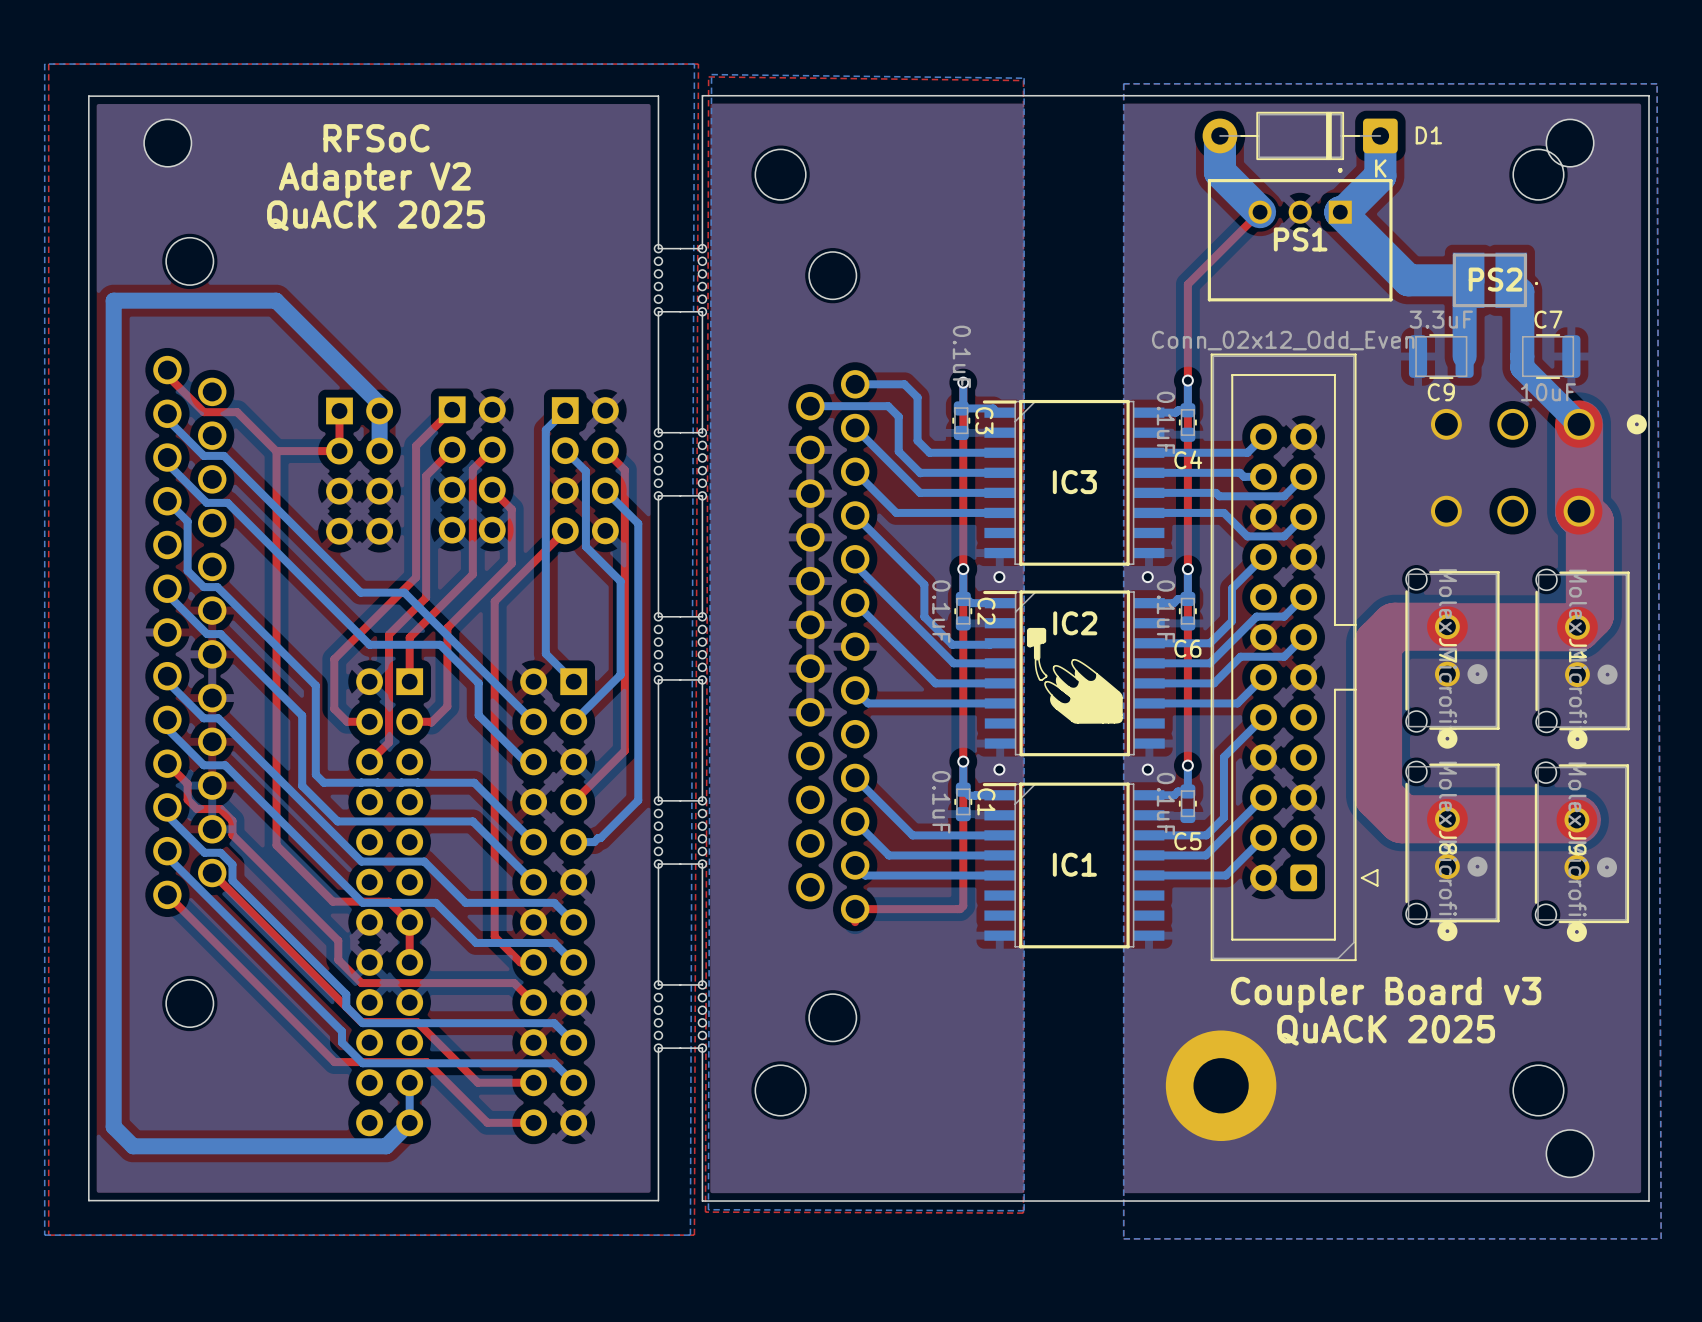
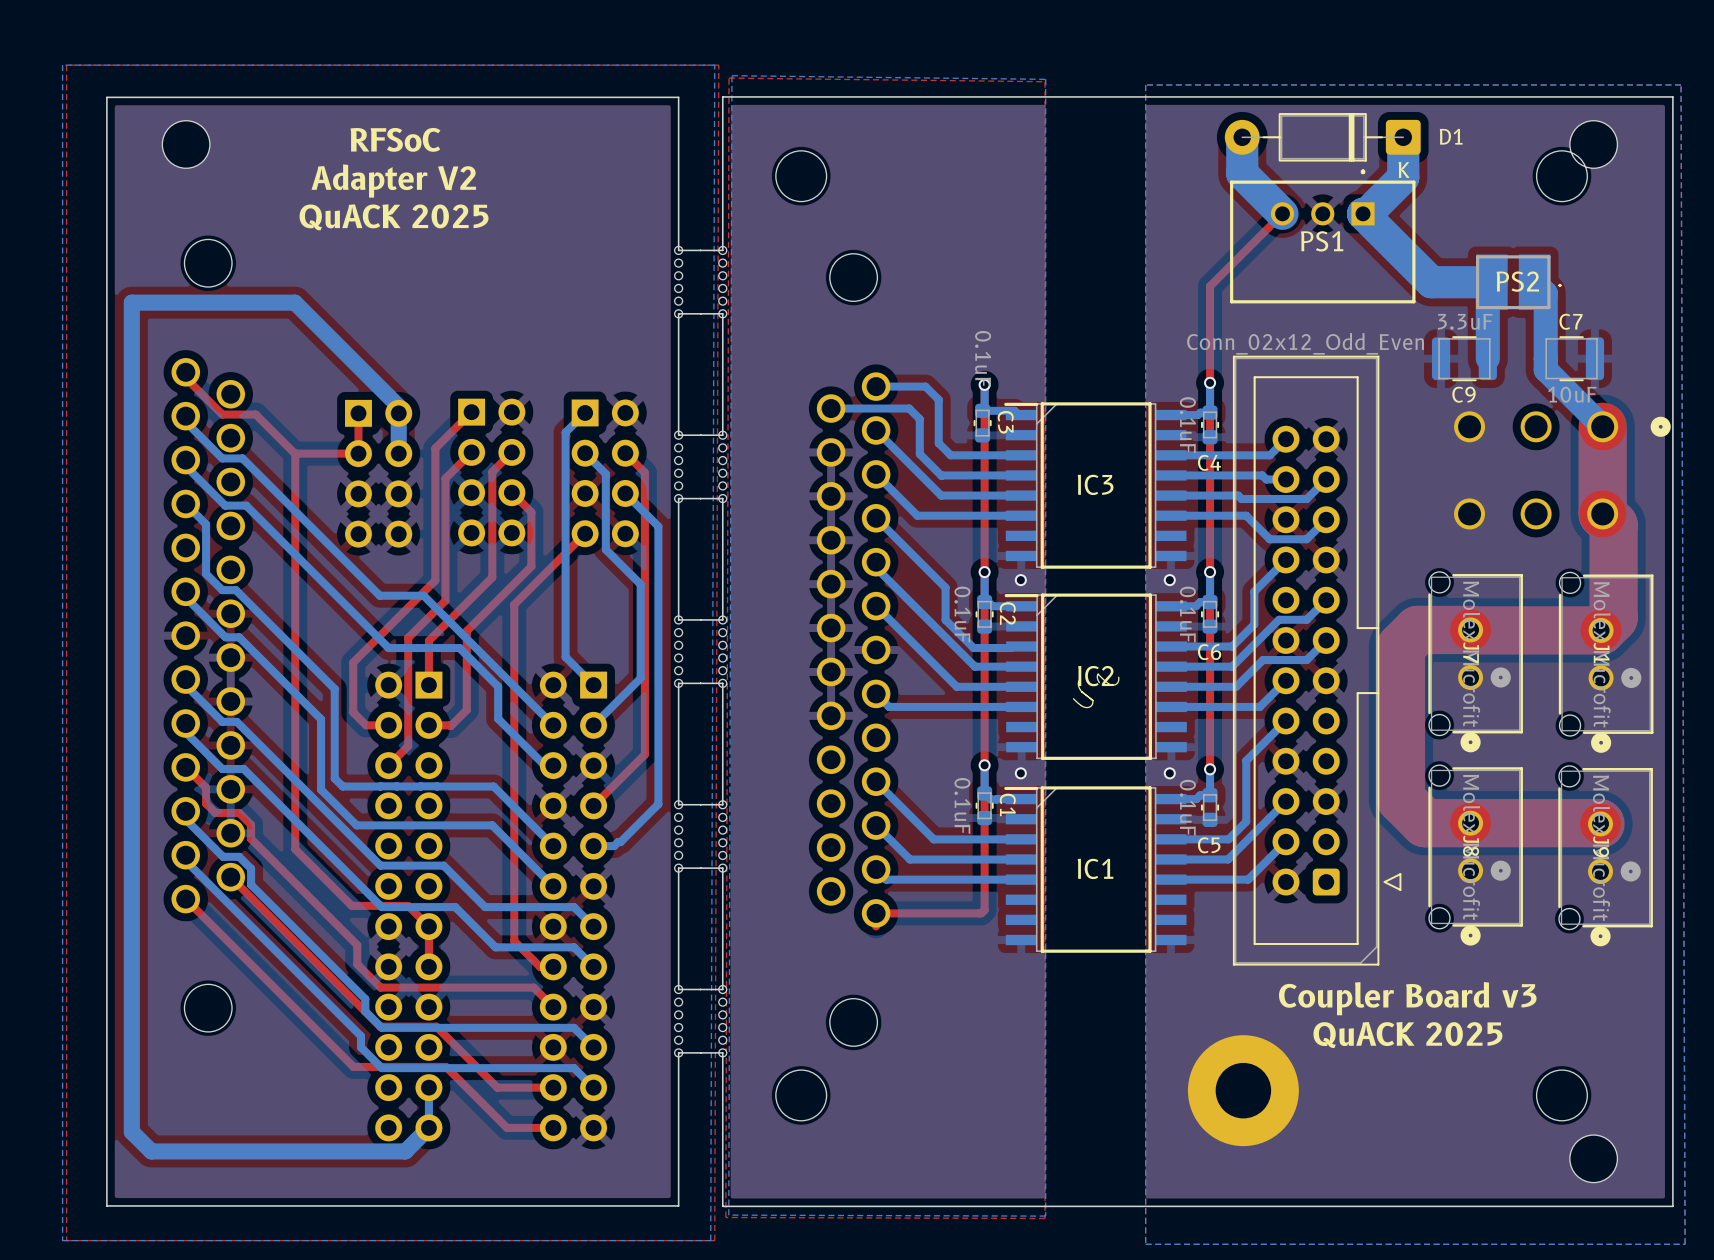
IC2 name position: IC2 (1075, 623) -> IC2 (1095, 676)
drawing: [1027, 628, 1122, 723] -> none
line: (1043, 628) (1028, 629) (1028, 646) (1045, 641) (1045, 630) (1043, 628) -> none
line: (1038, 659) (1041, 668) (1046, 676) (1041, 680) (1036, 672) (1035, 659) -> none
line: (1076, 670) (1072, 664) (1073, 659) (1086, 665) (1120, 693) (1121, 697) (1121, 721) (1115, 722) (1073, 722) (1053, 705) (1050, 700) (1051, 695) (1045, 683) (1049, 682) (1060, 688) -> none
line: (1079, 680) (1060, 667) (1053, 666) (1057, 675) (1069, 687) (1076, 687) (1079, 680) -> none

